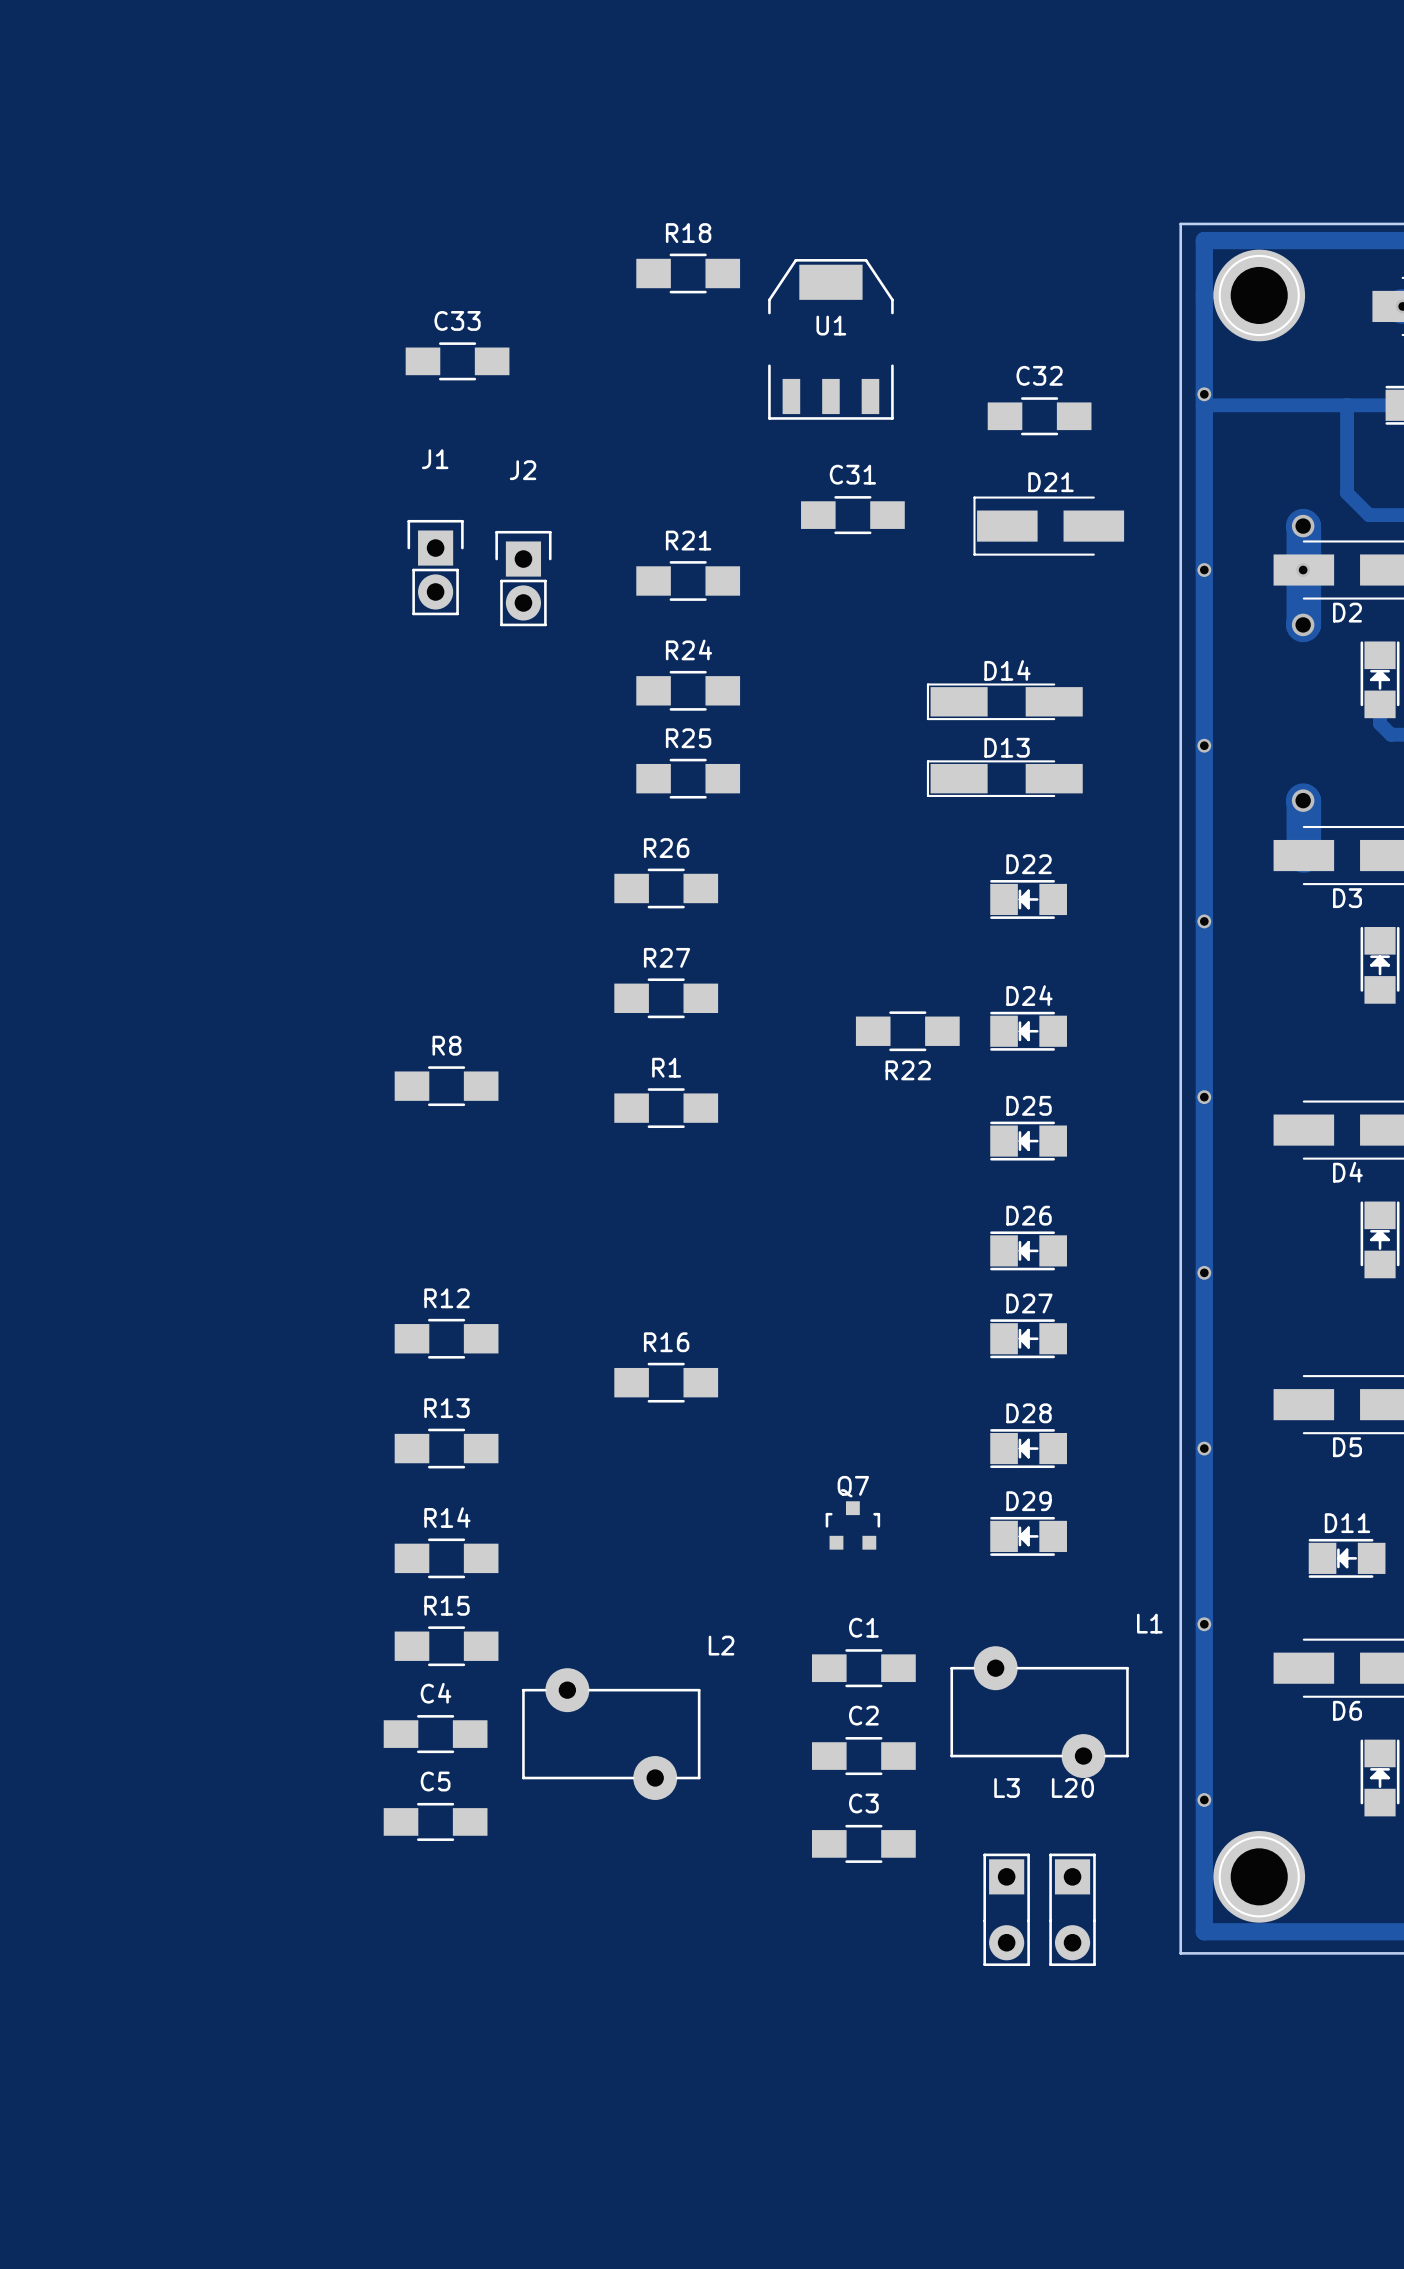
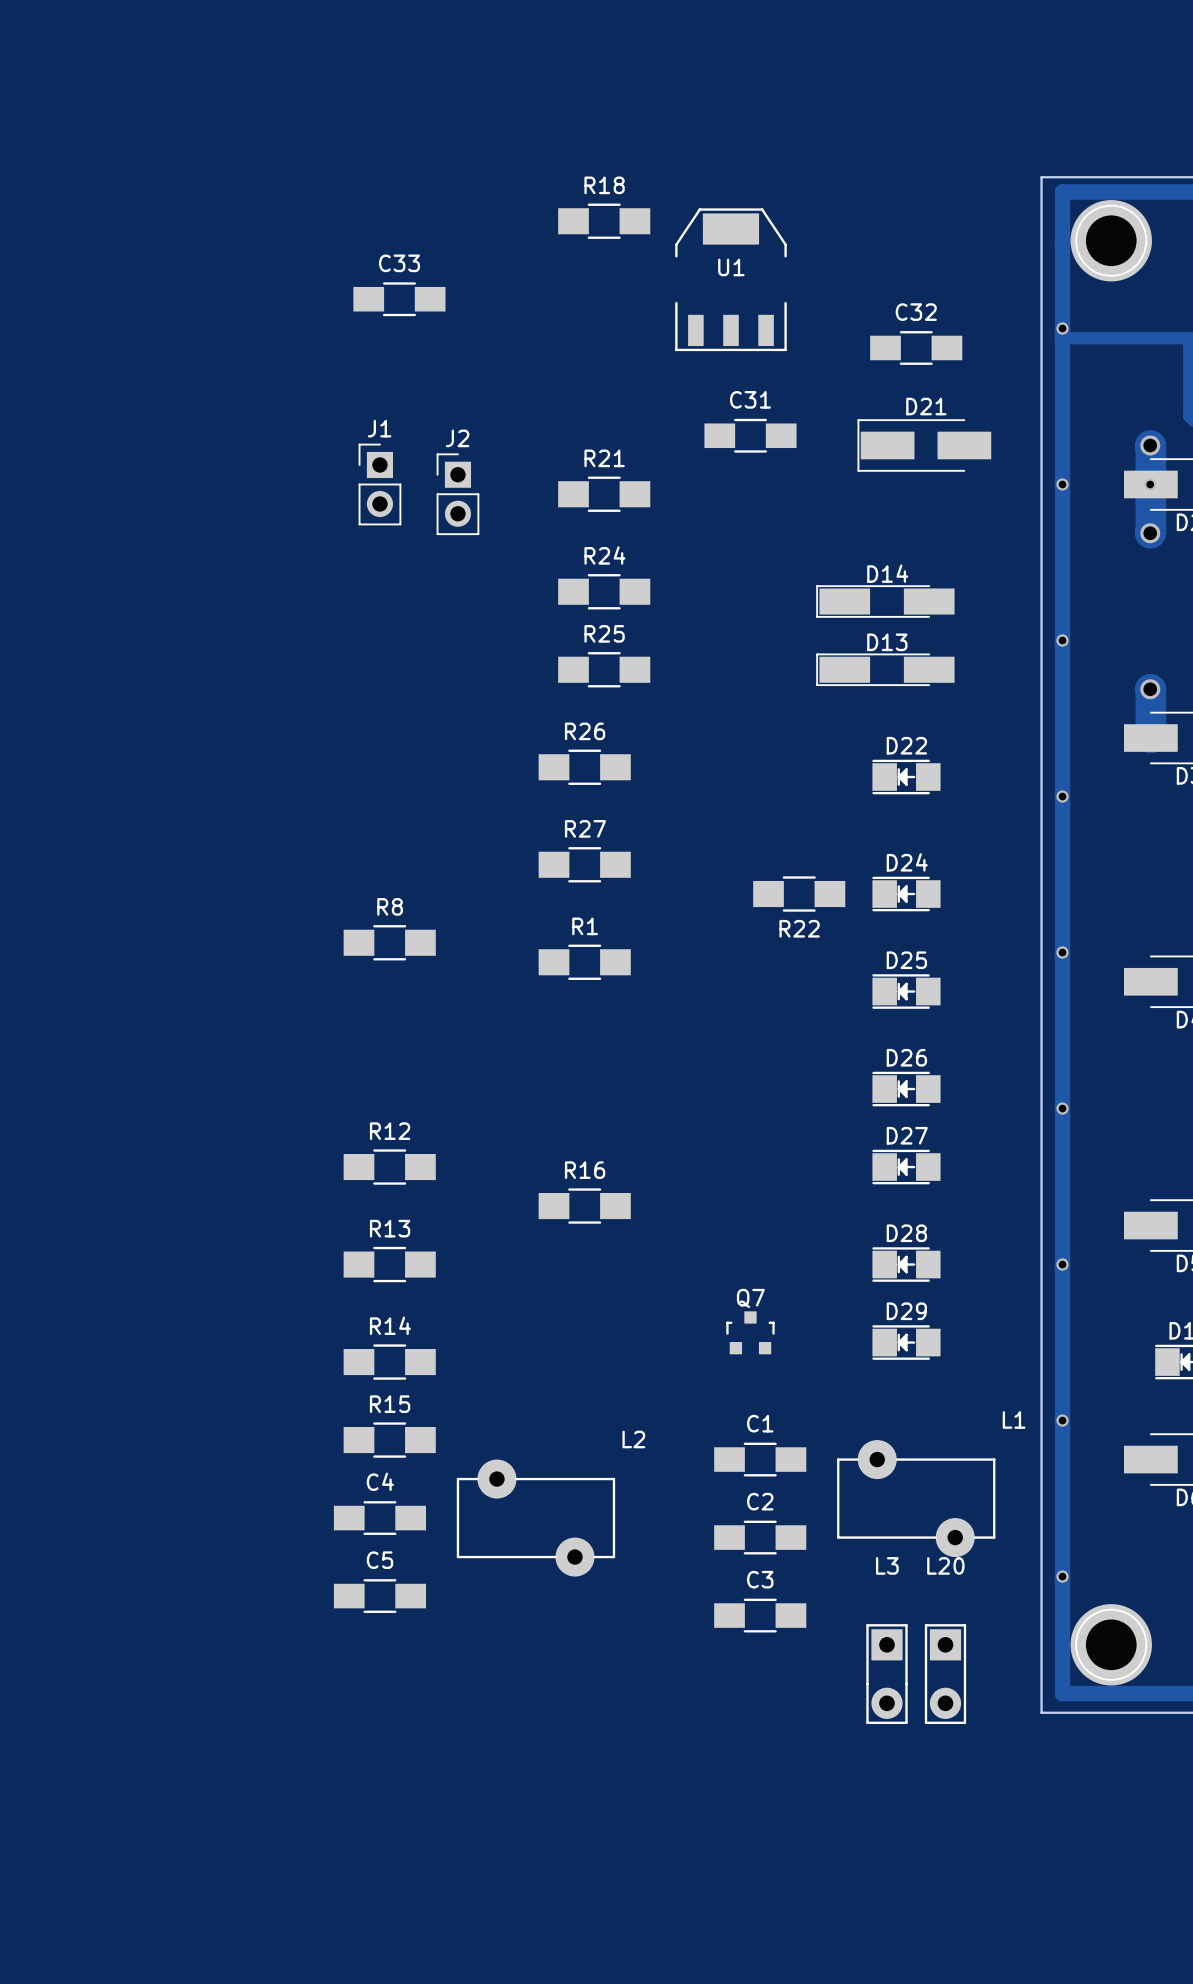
J1 name position: J1 (435, 459) -> J1 (379, 428)
J2 name position: J2 (523, 470) -> J2 (457, 438)
J1 footprint: [407, 519, 464, 616] -> [358, 443, 402, 526]
J2 footprint: [495, 530, 552, 627] -> [436, 453, 480, 536]

